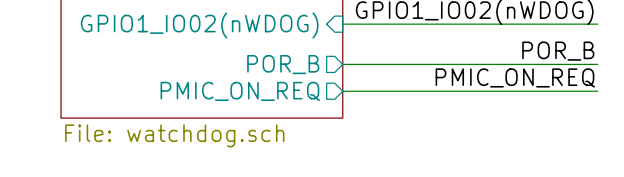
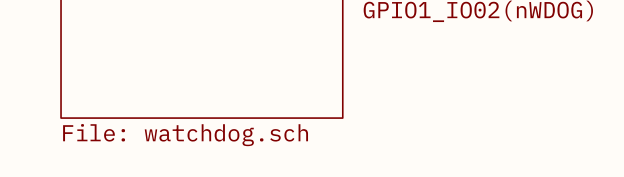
wire: (342, 24) (597, 24) -> none
sheet pin: GPIO1_IO02(nWDOG) (199, 25) -> none
label: POR_B (558, 51) -> none
sheet pin: POR_B (283, 64) -> none
wire: (342, 64) (597, 64) -> none
label: PMIC_ON_REQ (515, 77) -> none
sheet pin: PMIC_ON_REQ (240, 91) -> none
wire: (342, 91) (597, 91) -> none

